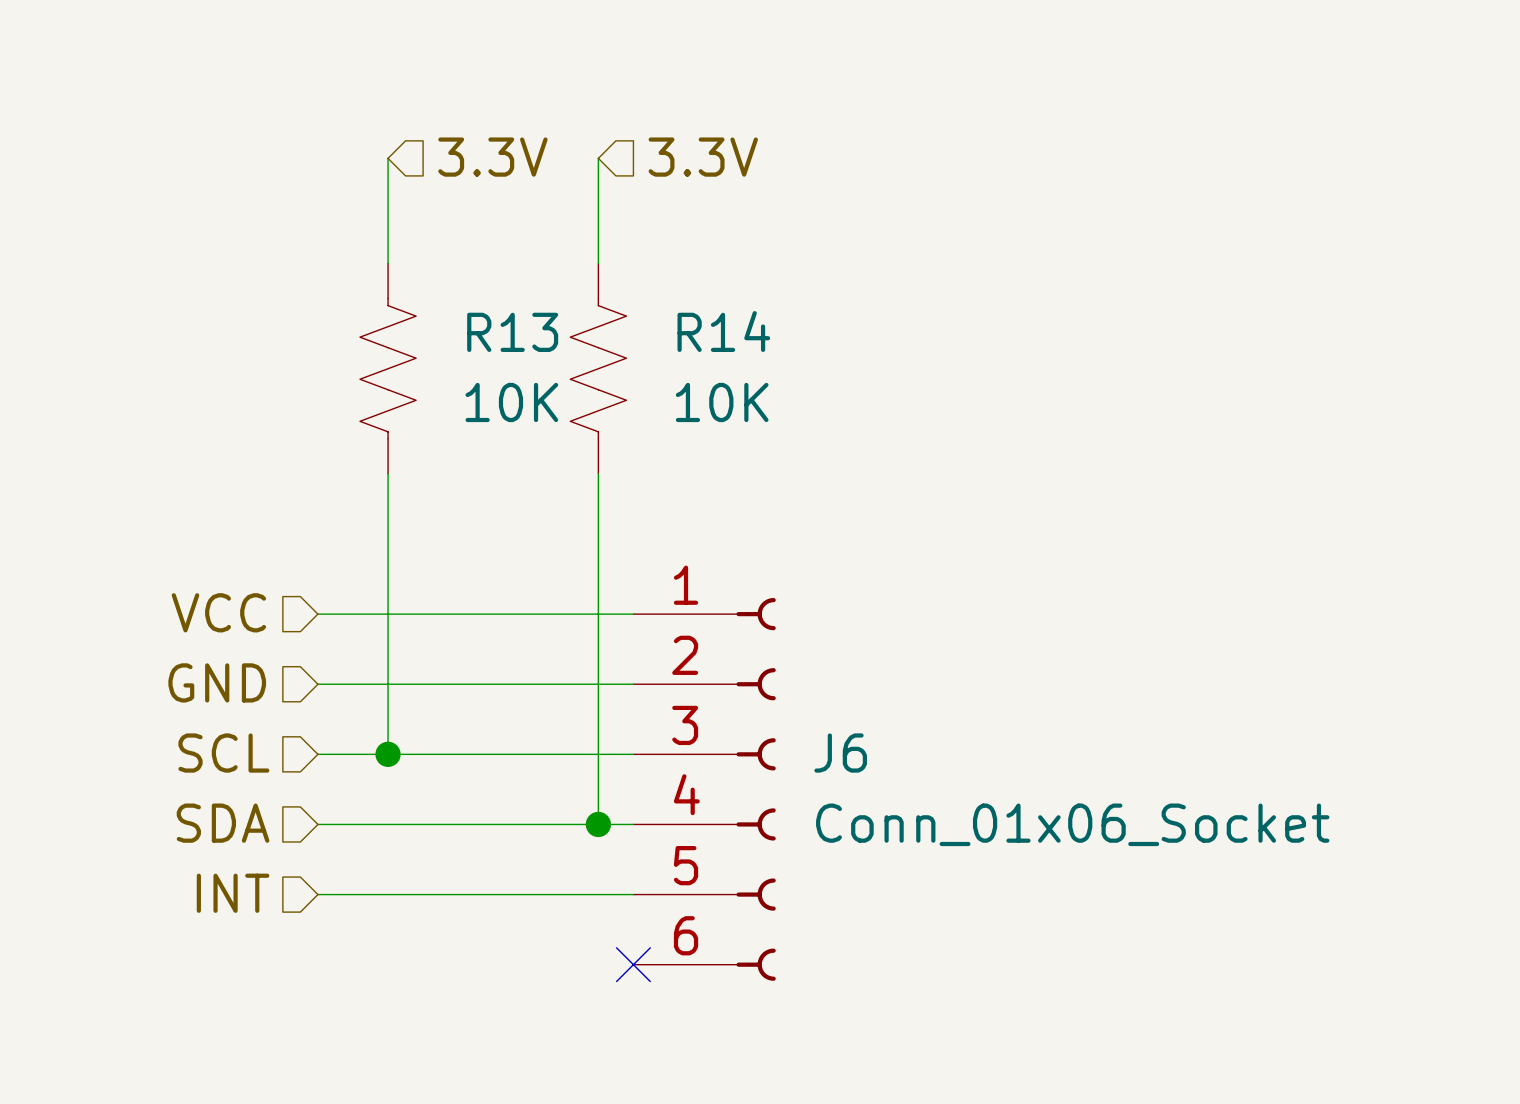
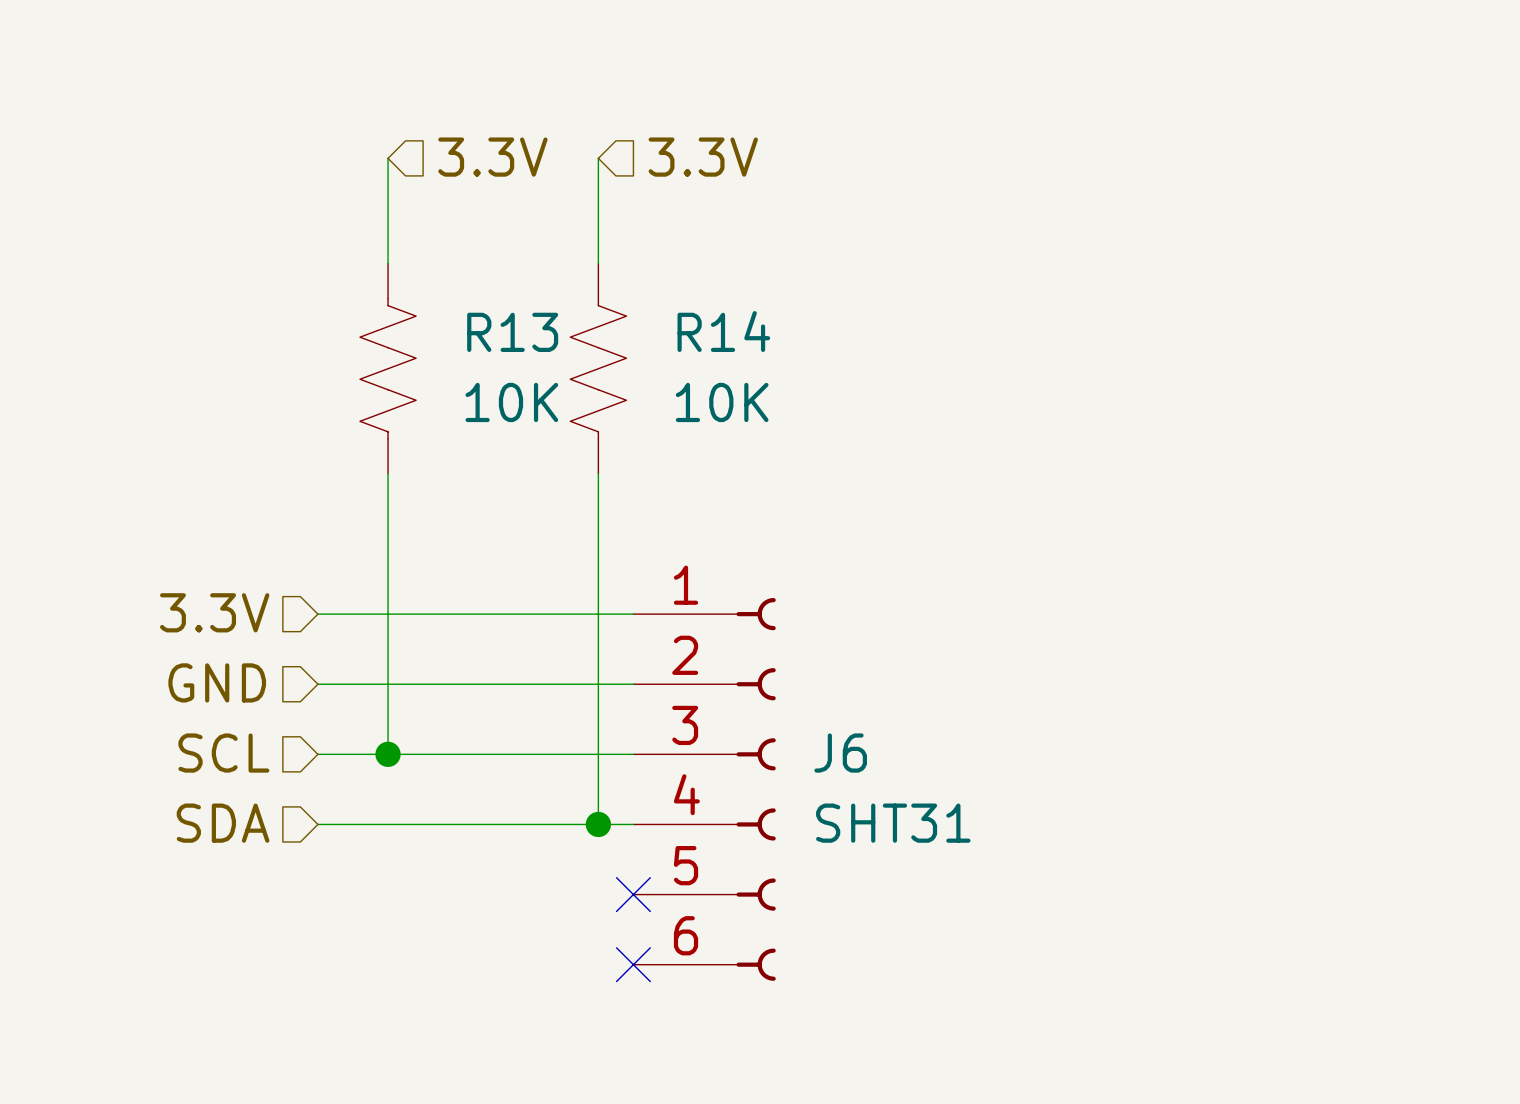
hierarchical label: VCC (218, 612) -> 3.3V (214, 612)
J6 value: Conn_01x06_Socket (1072, 824) -> SHT31 (893, 823)
hierarchical label: INT (233, 893) -> none
wire: (317, 894) (633, 894) -> none
no-connect mark: none -> (633, 894)

